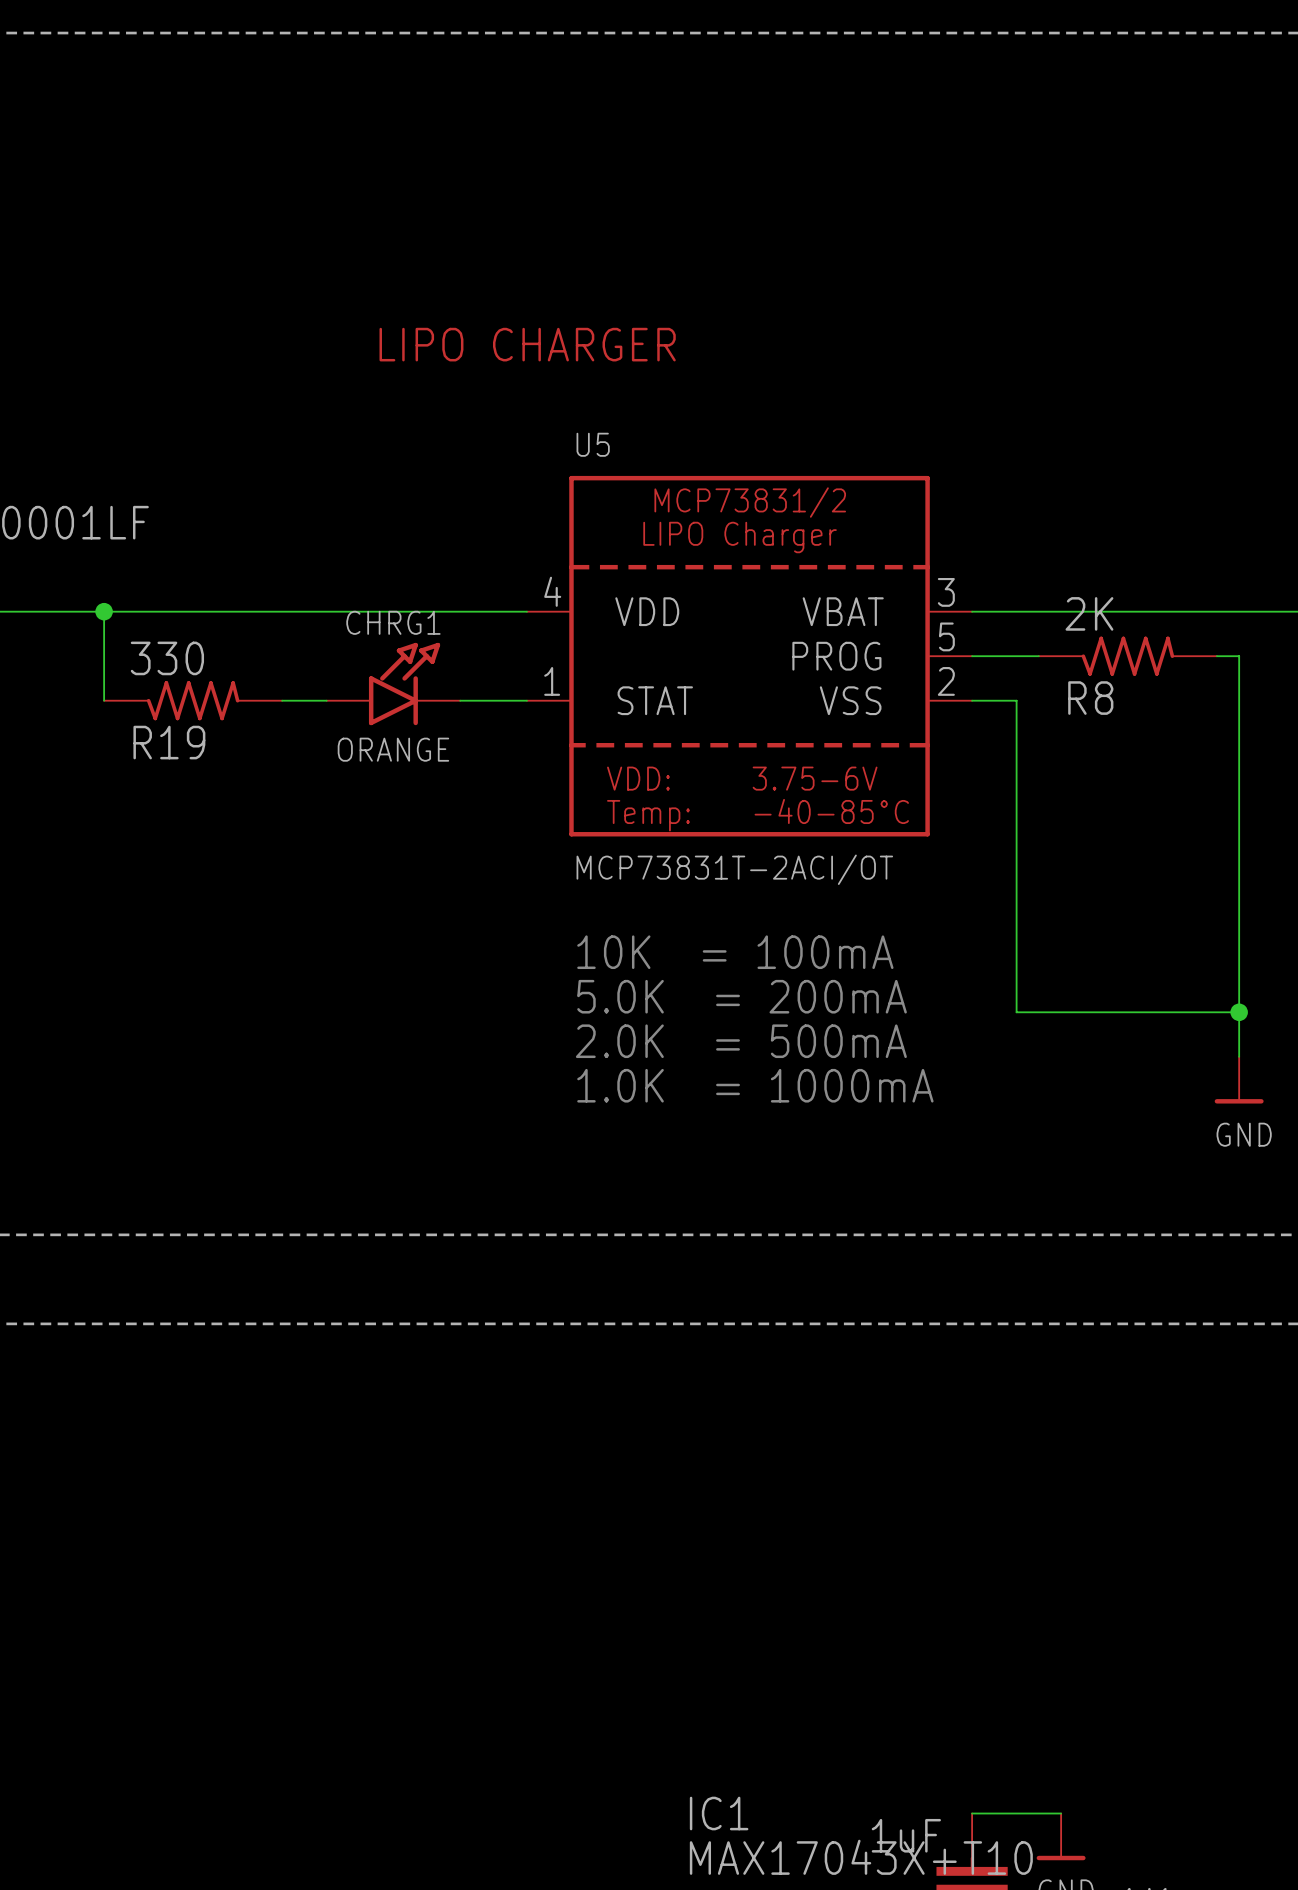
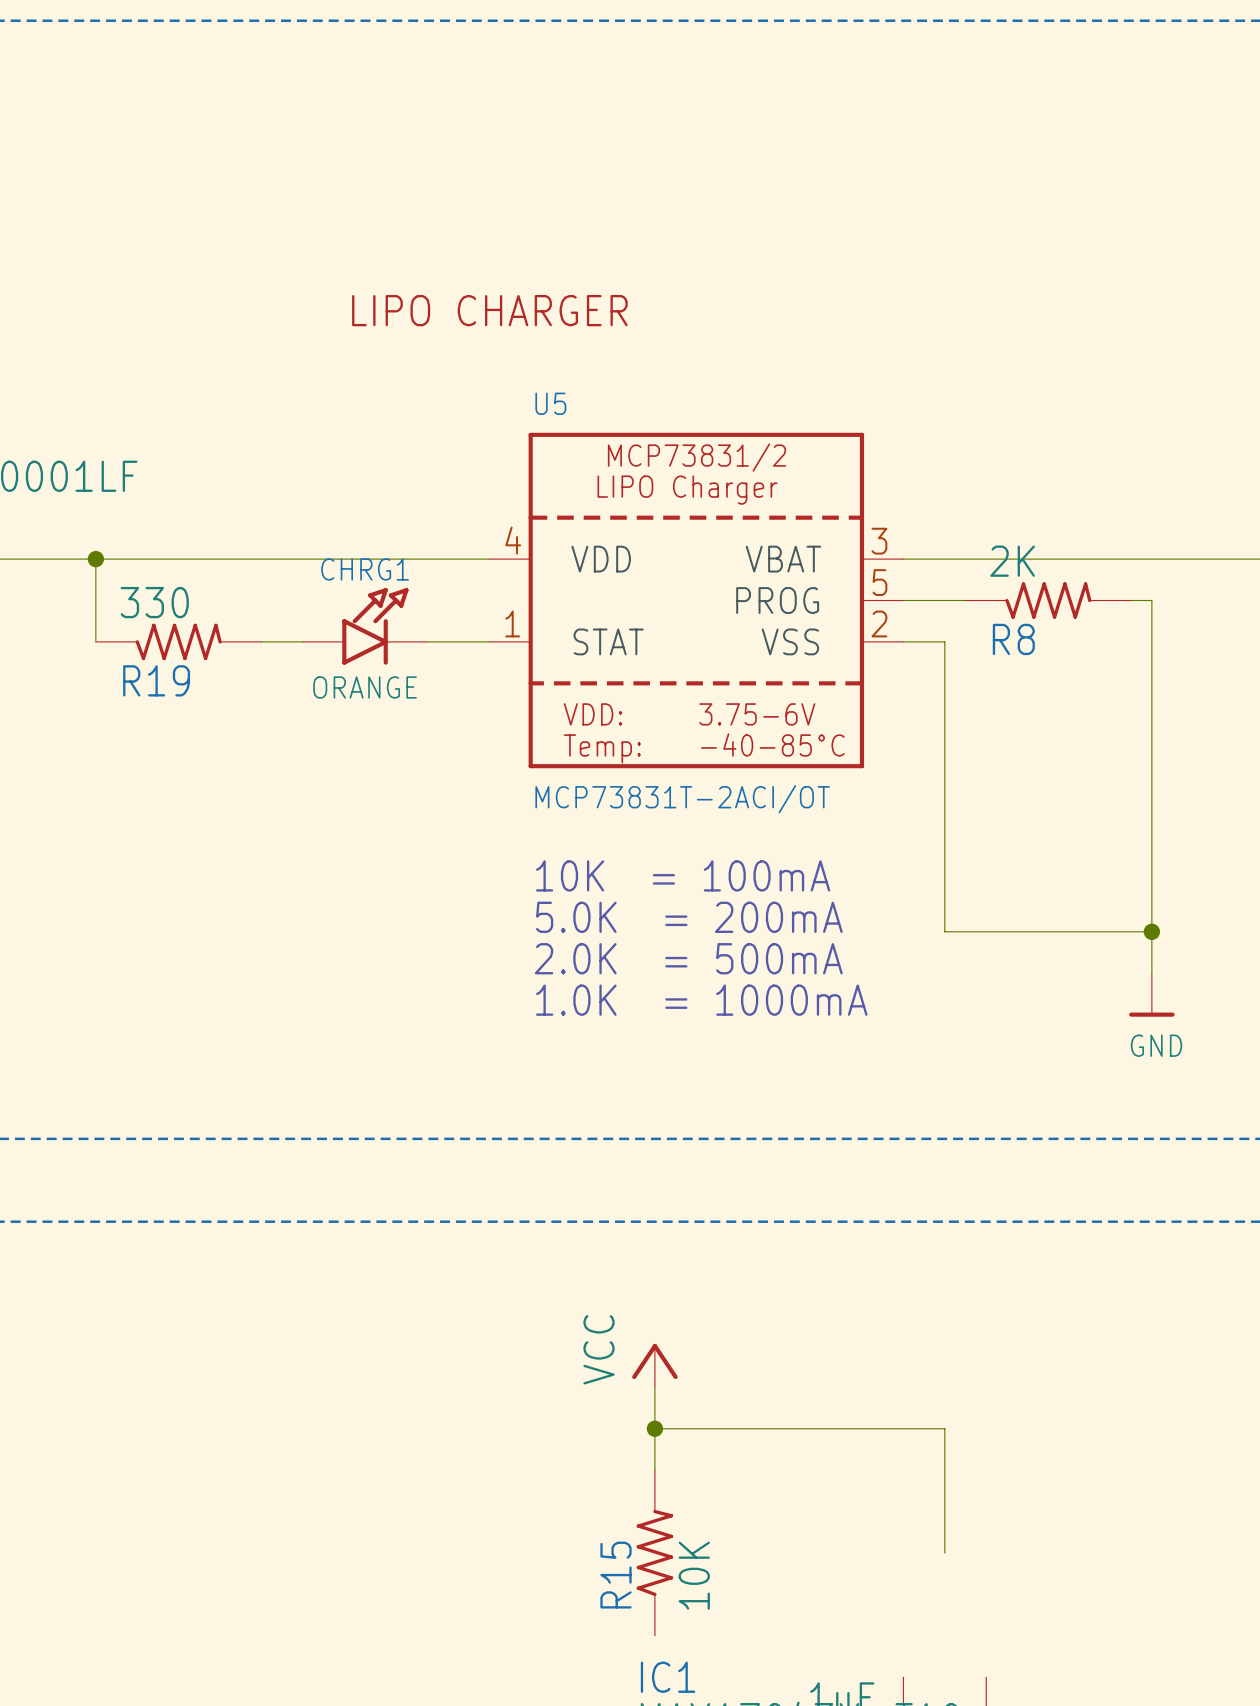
power symbol: none -> VCC (654, 1365)
wire: none -> (654, 1387) (654, 1470)
wire: none -> (654, 1428) (944, 1428) (944, 1552)
junction: none -> (654, 1428)
R15: none -> 10K (654, 1552)
wire: (972, 1813) (1061, 1813) -> none

